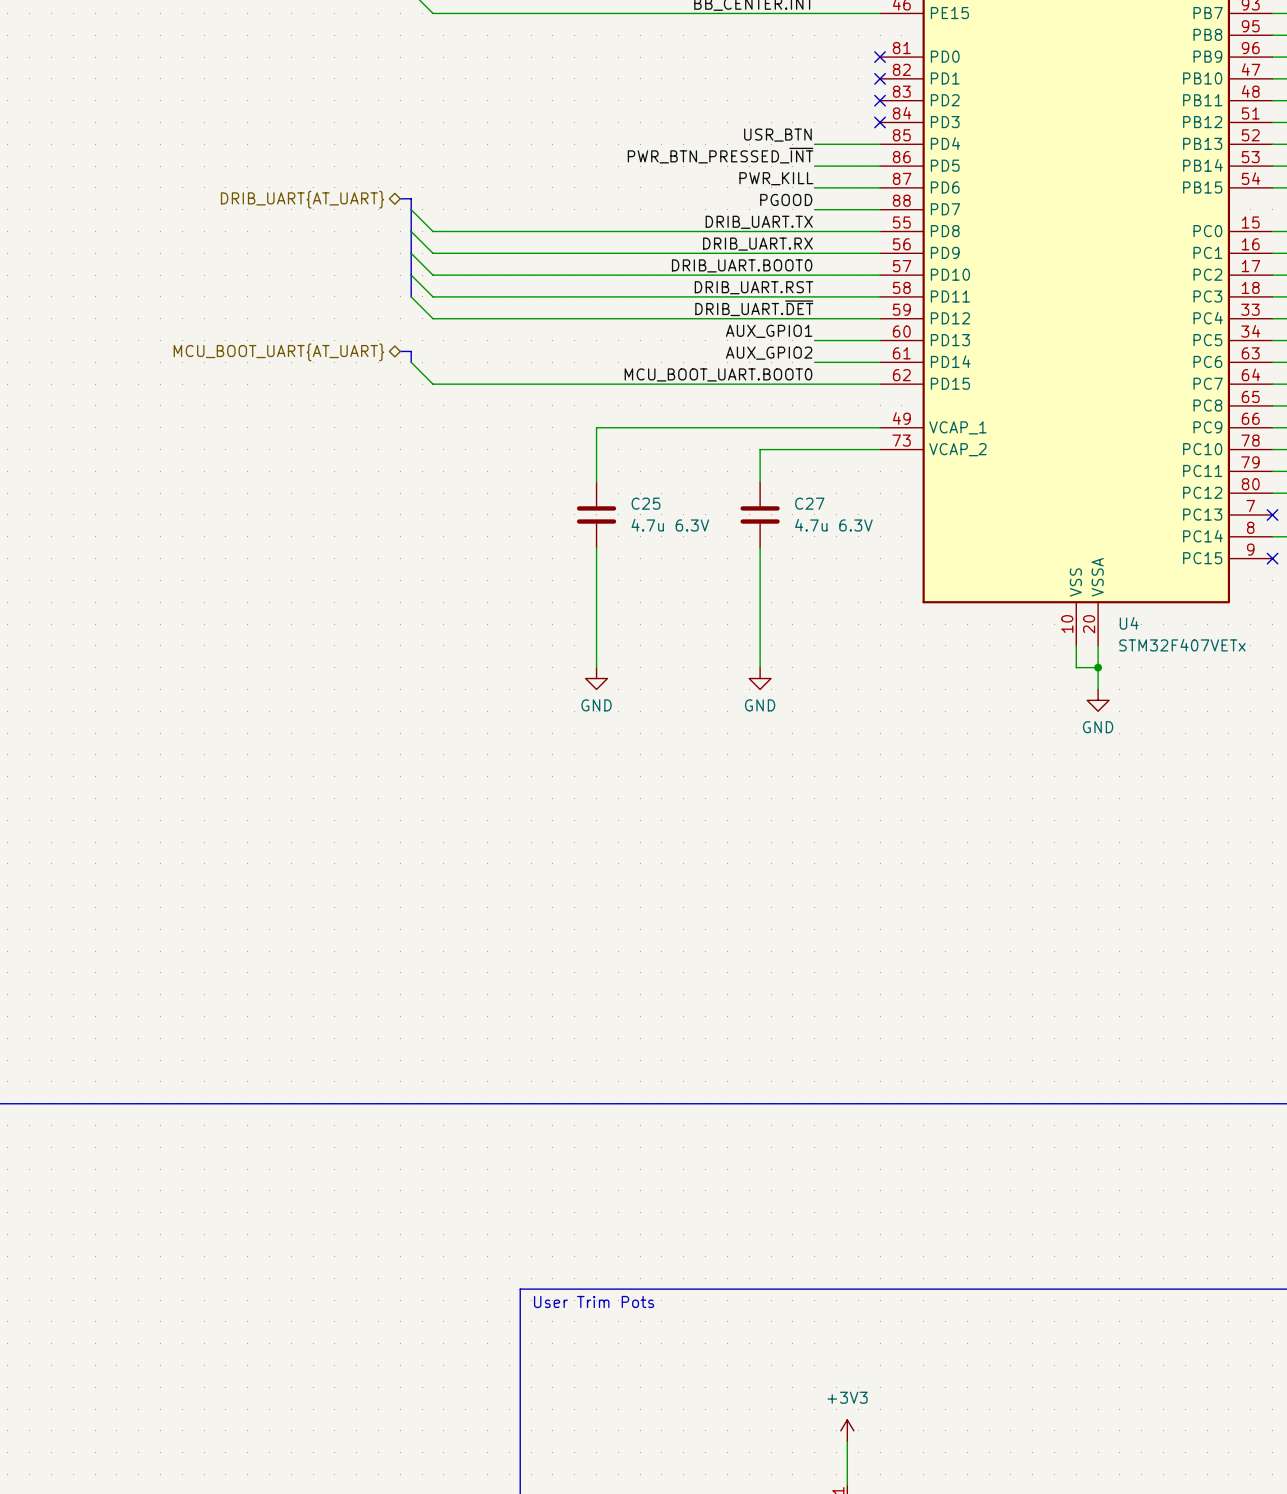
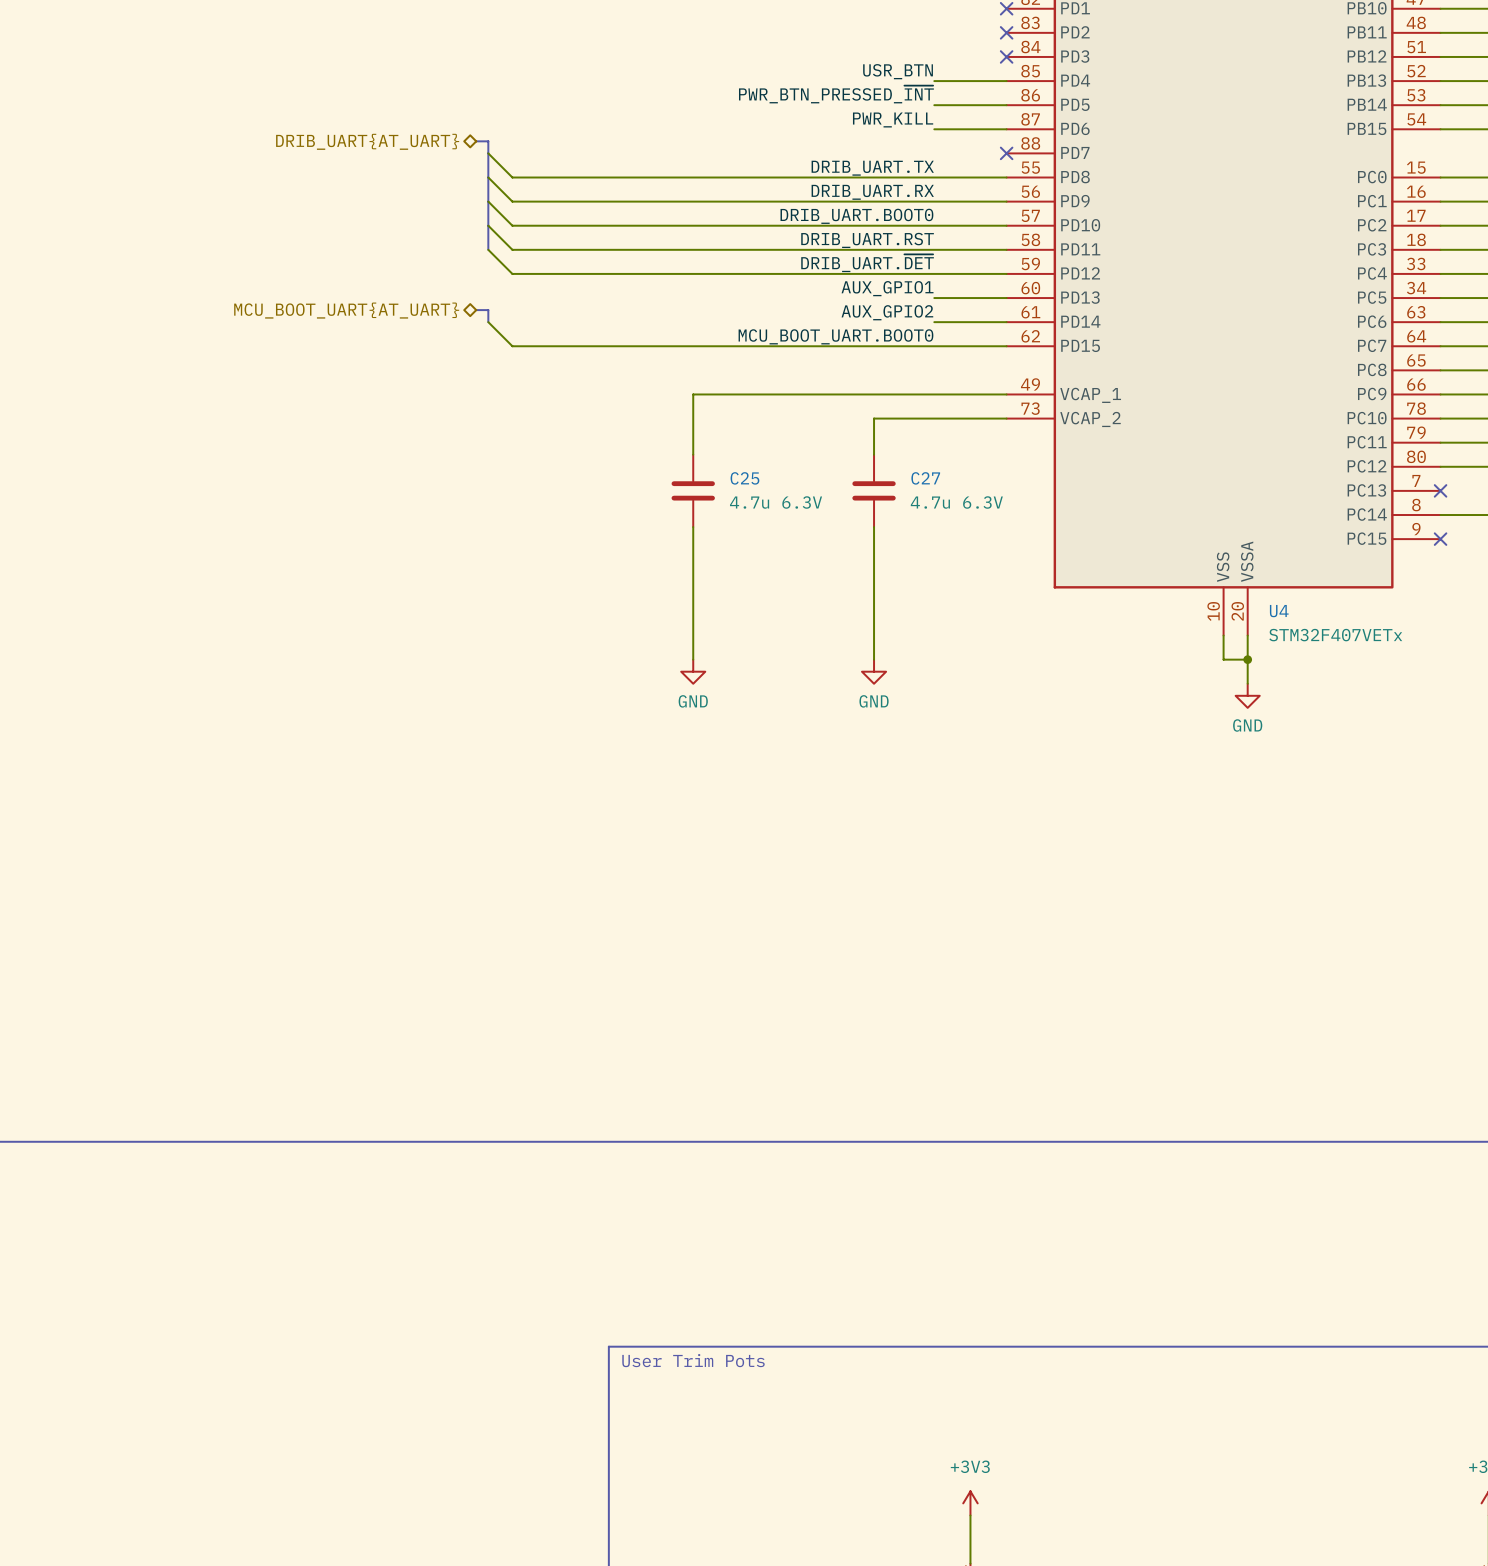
label: PGOOD (786, 199) -> none
wire: (814, 209) (880, 209) -> none
no-connect mark: none -> (1006, 153)

